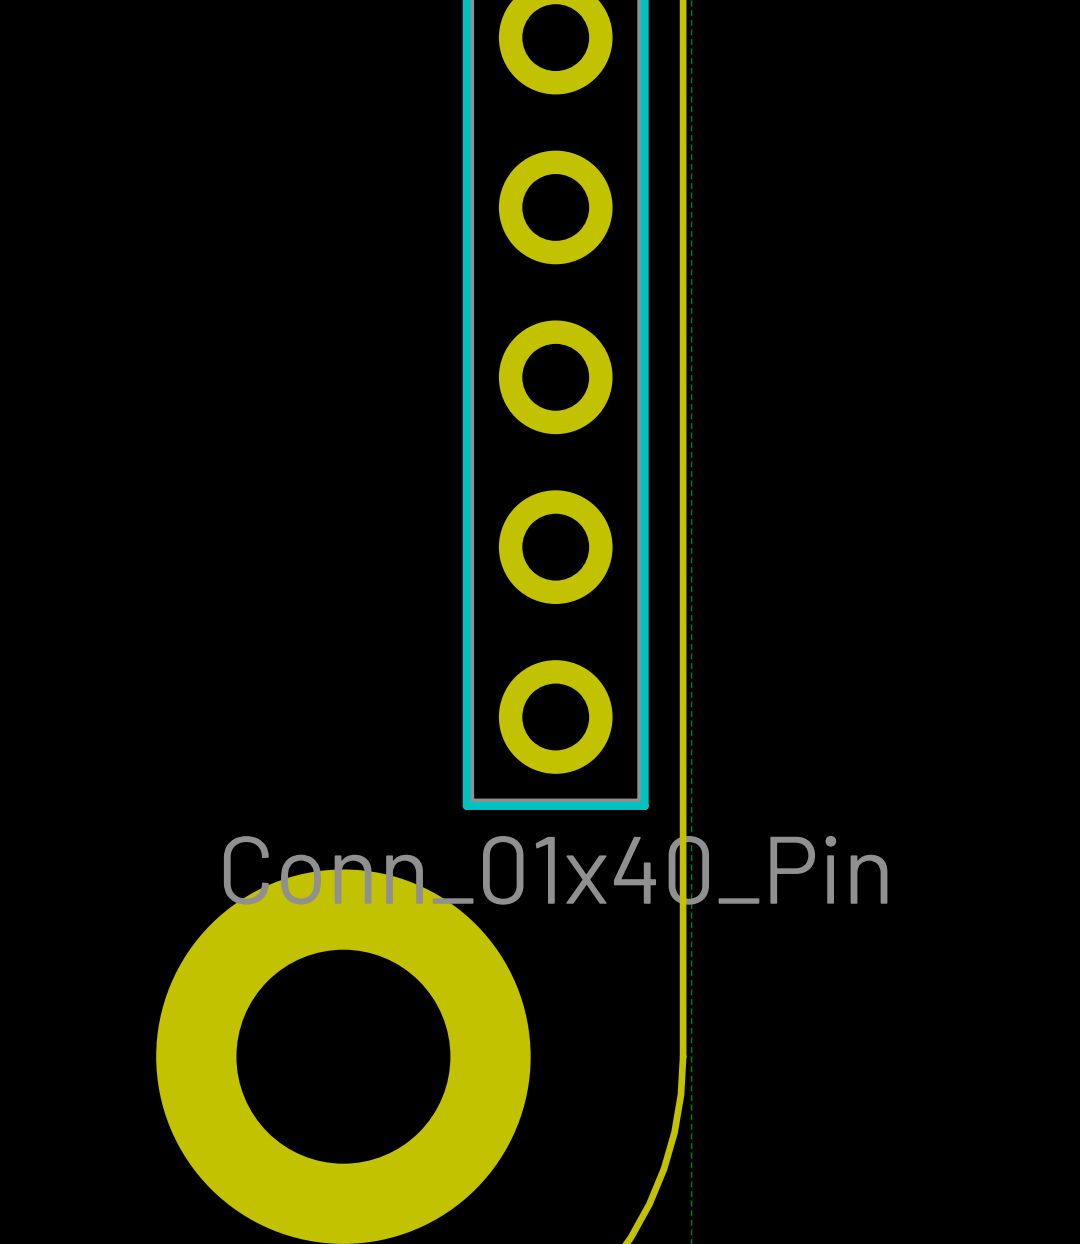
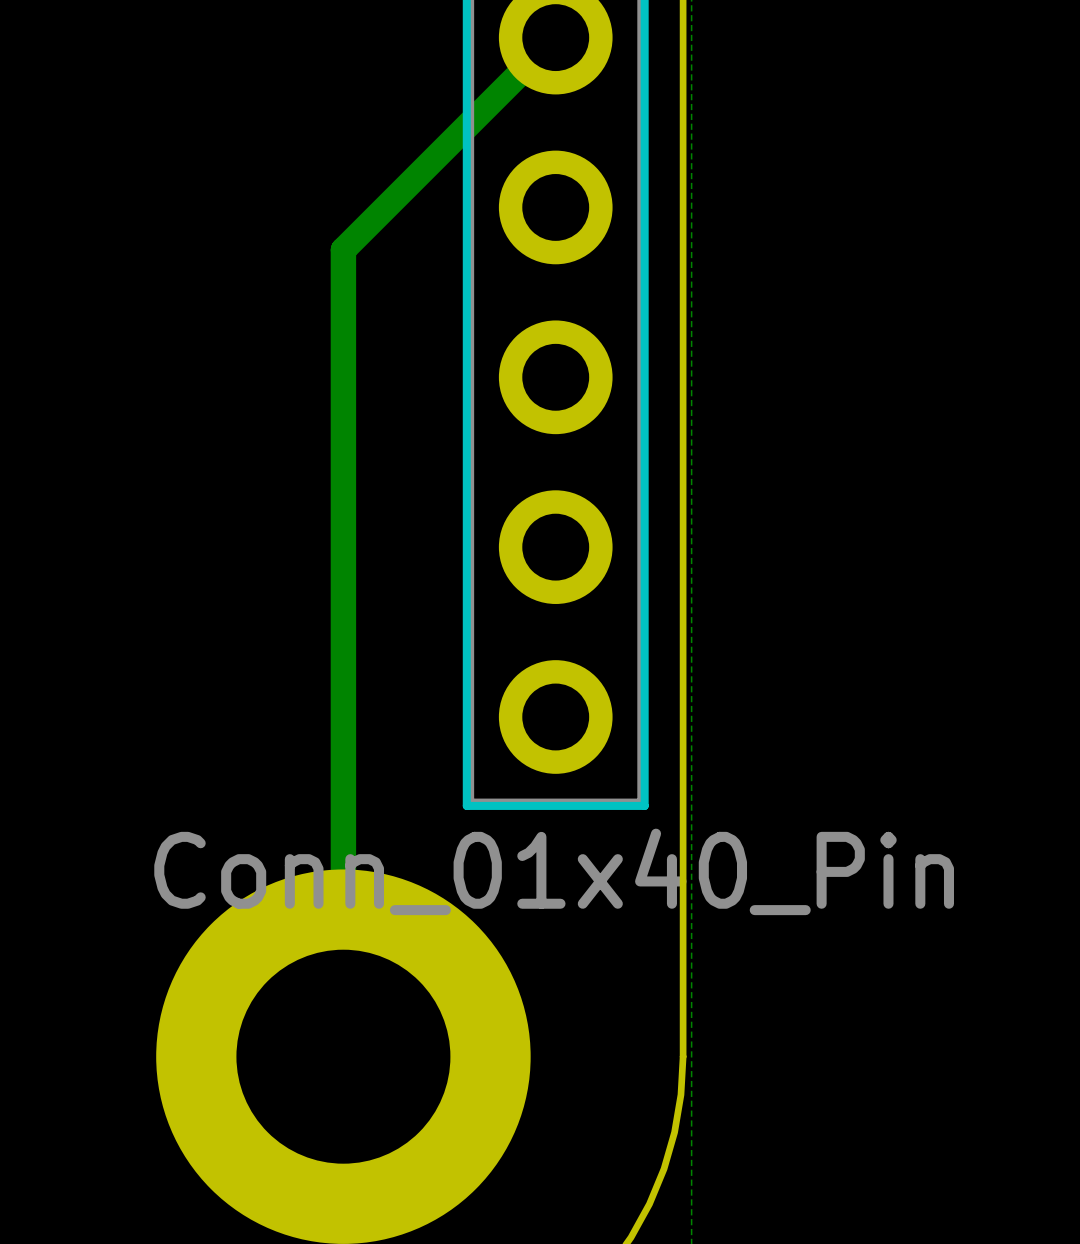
track: none -> (555, 37) (343, 249) (343, 1056)

